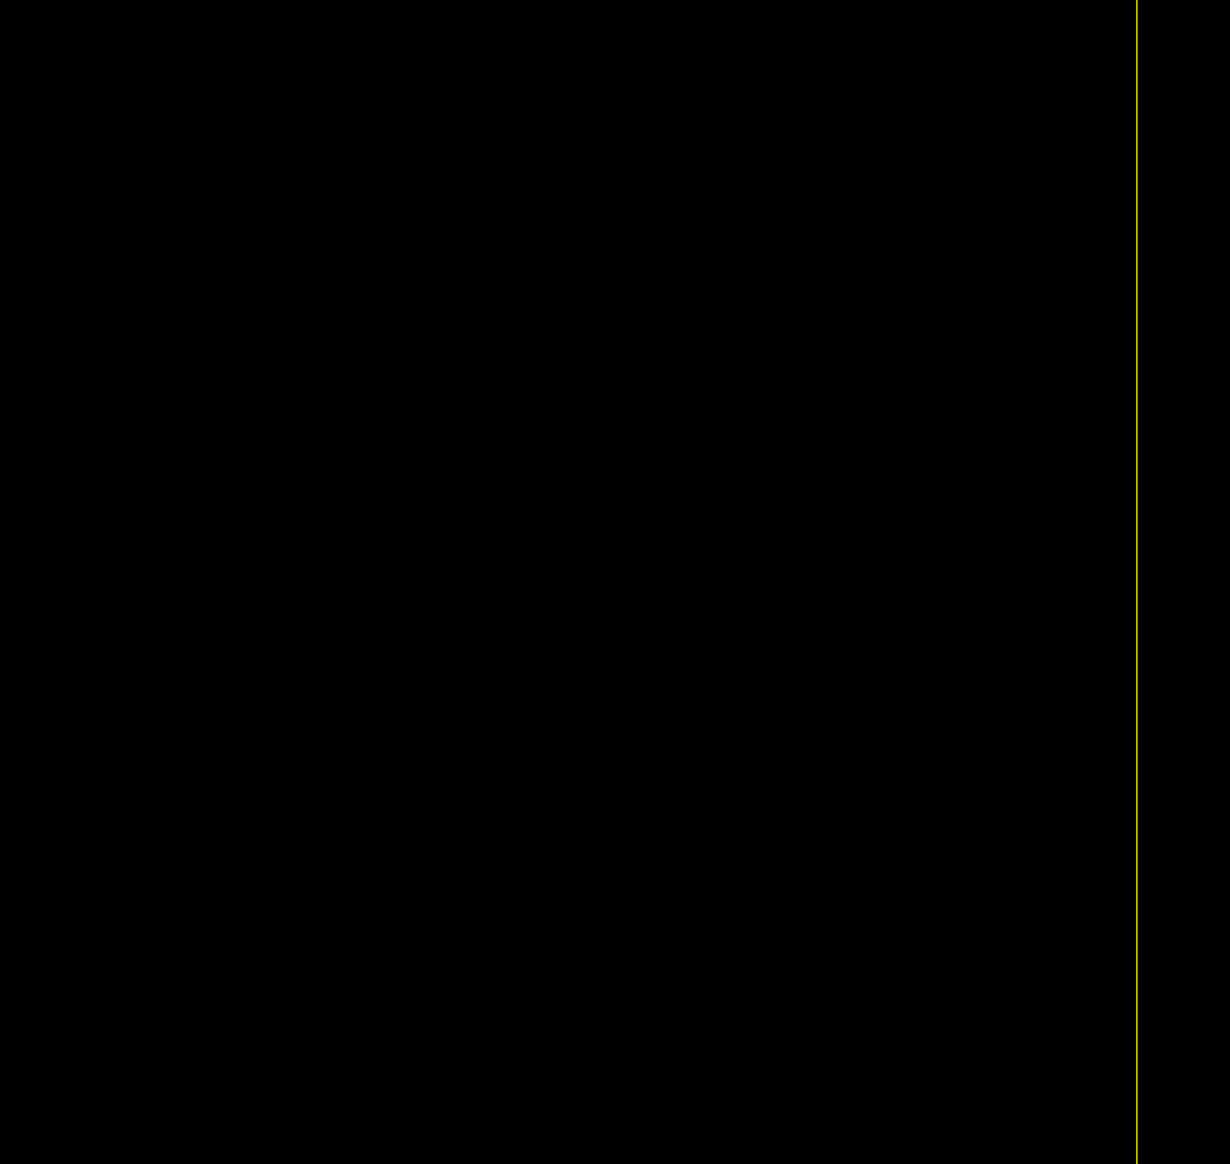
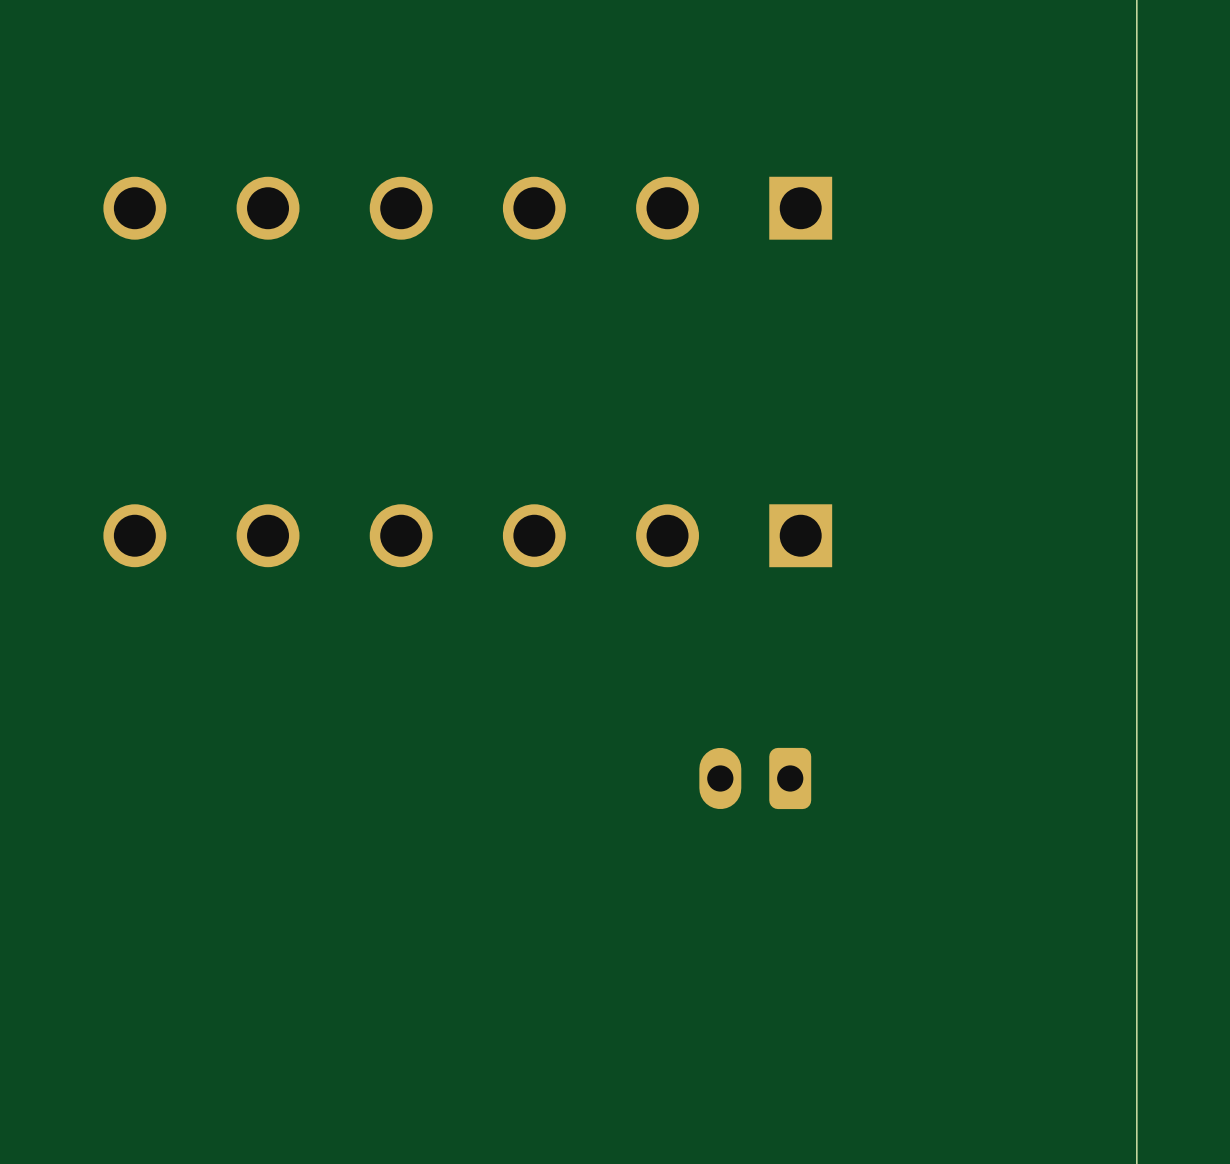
part: none -> (467, 208)
part: none -> (467, 535)
part: none -> (755, 778)

